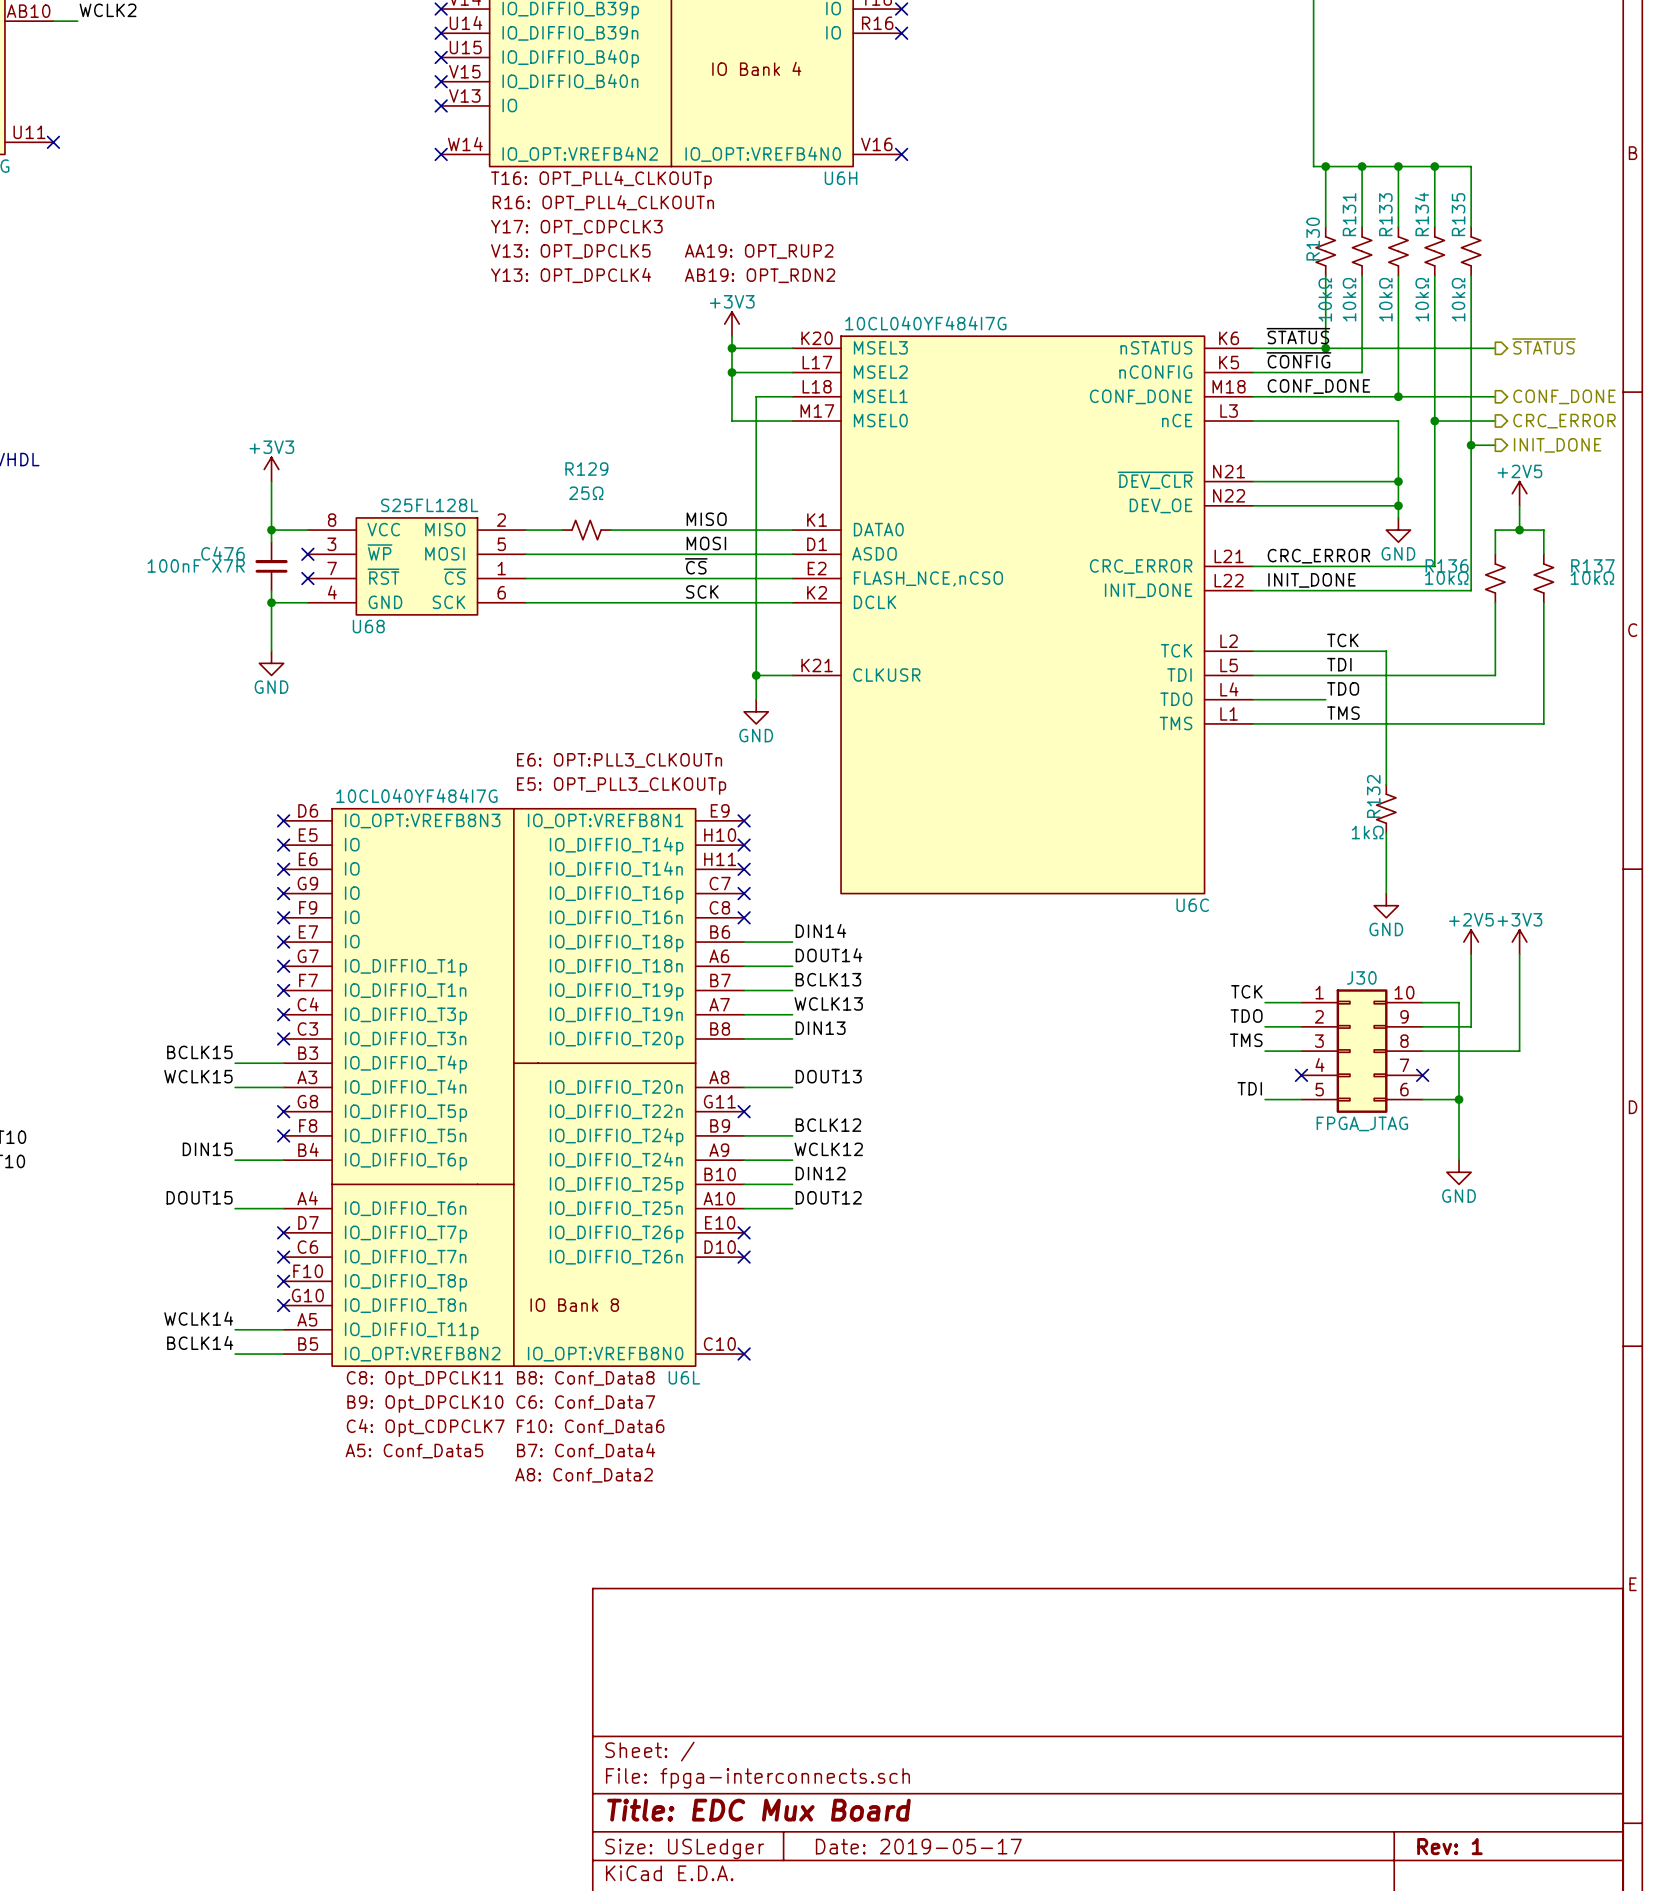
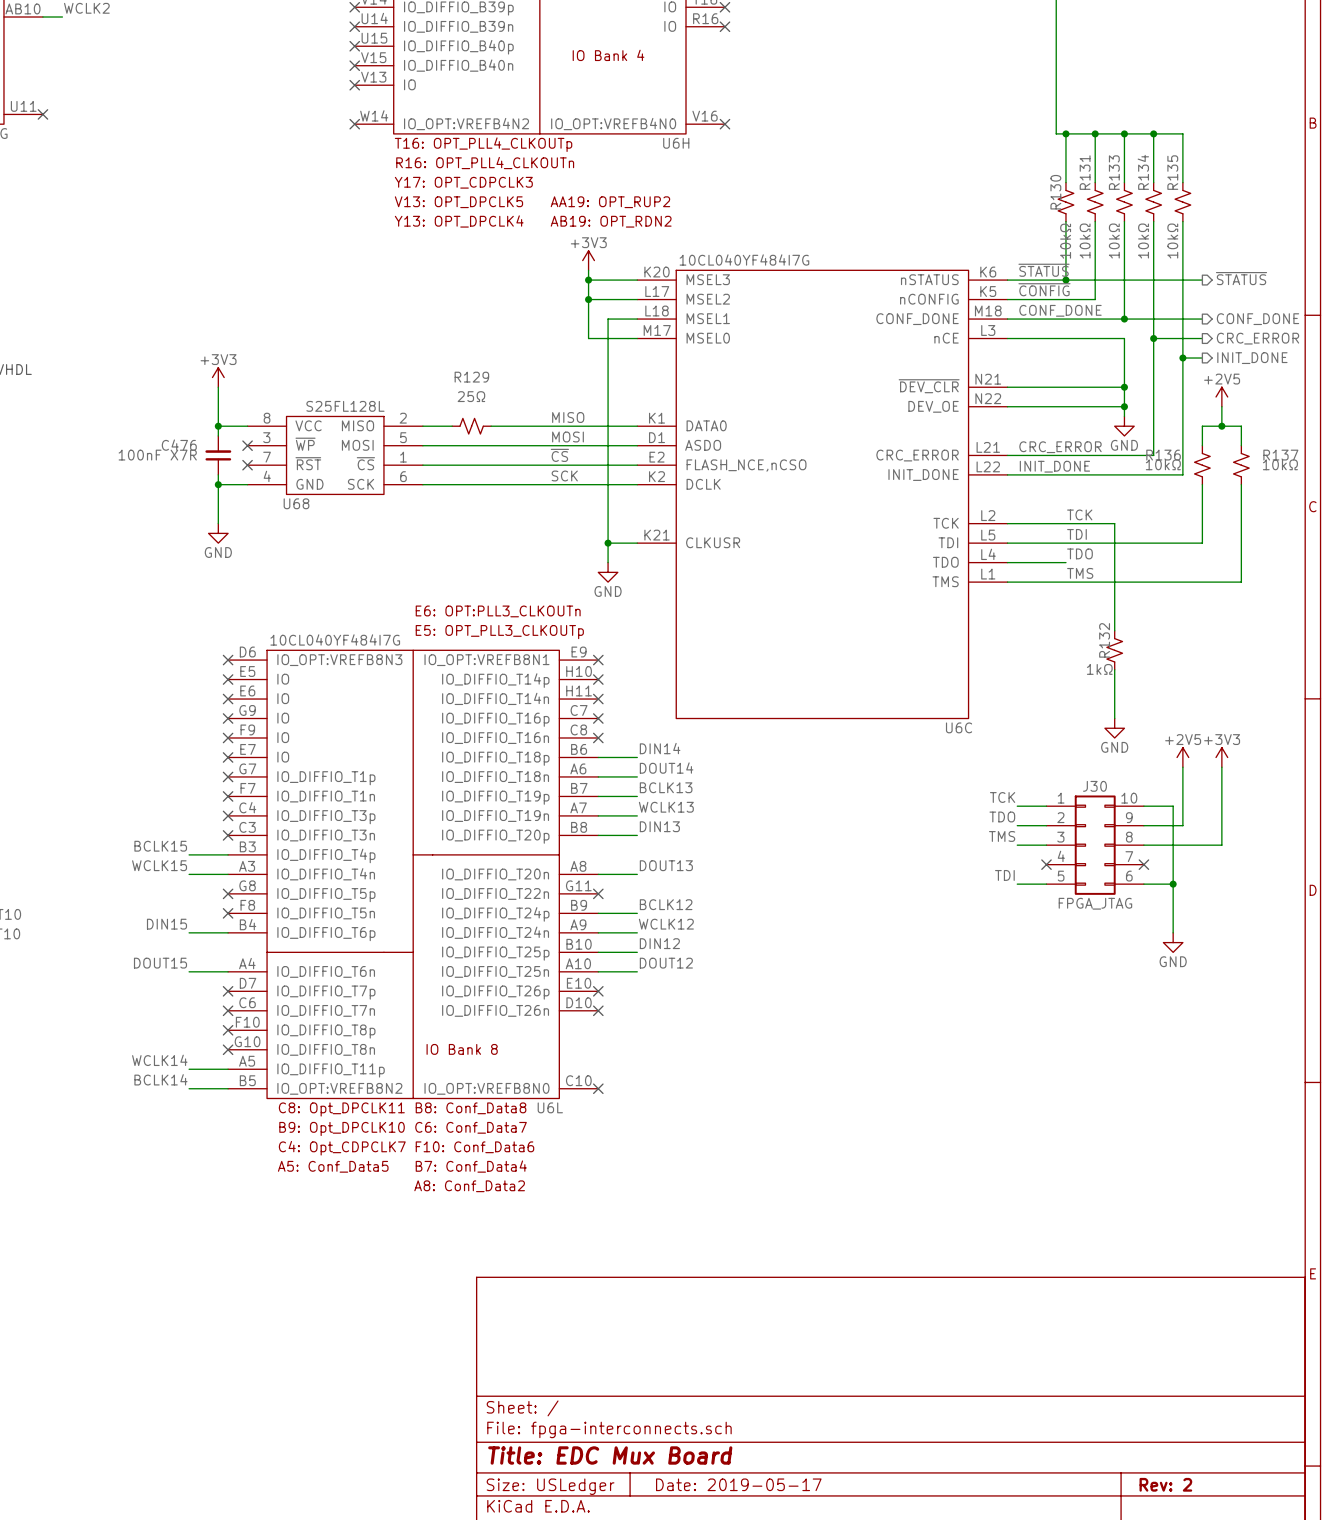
title block: Rev: 1 (1449, 1846) -> Rev: 2 (1165, 1484)

